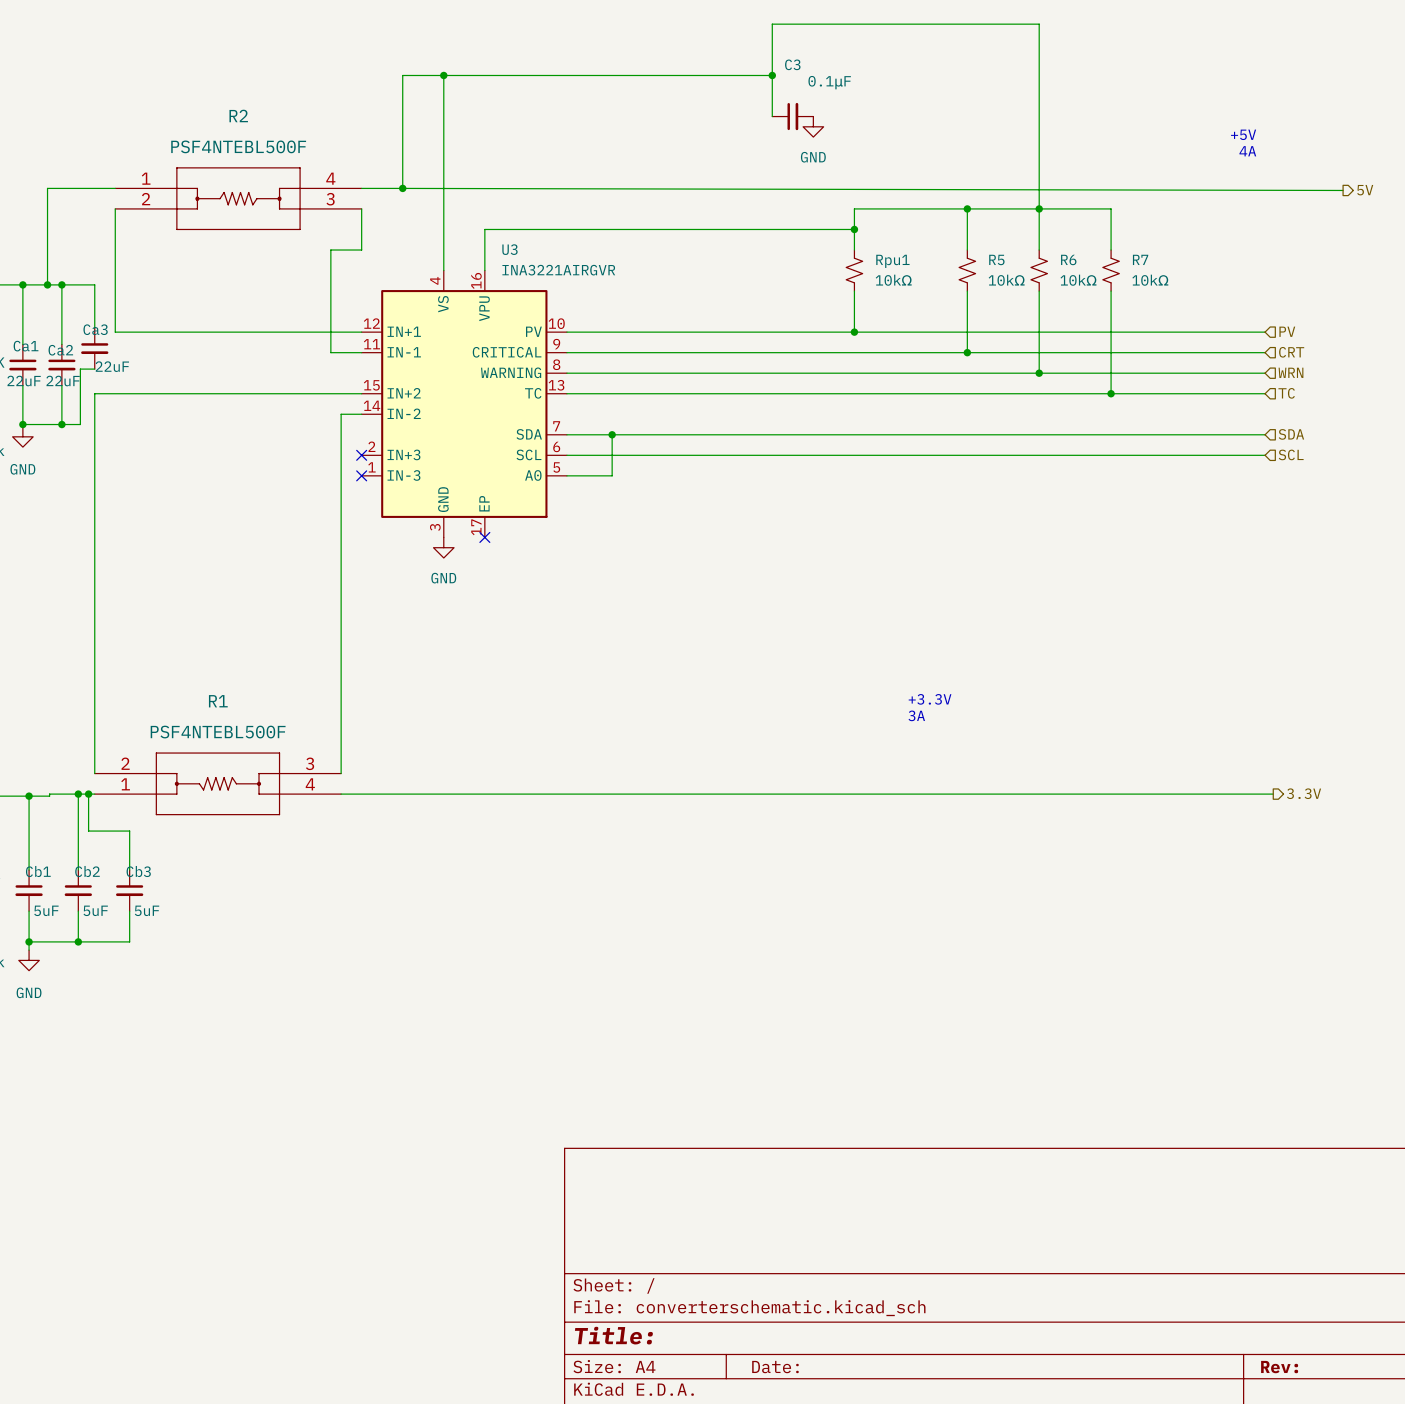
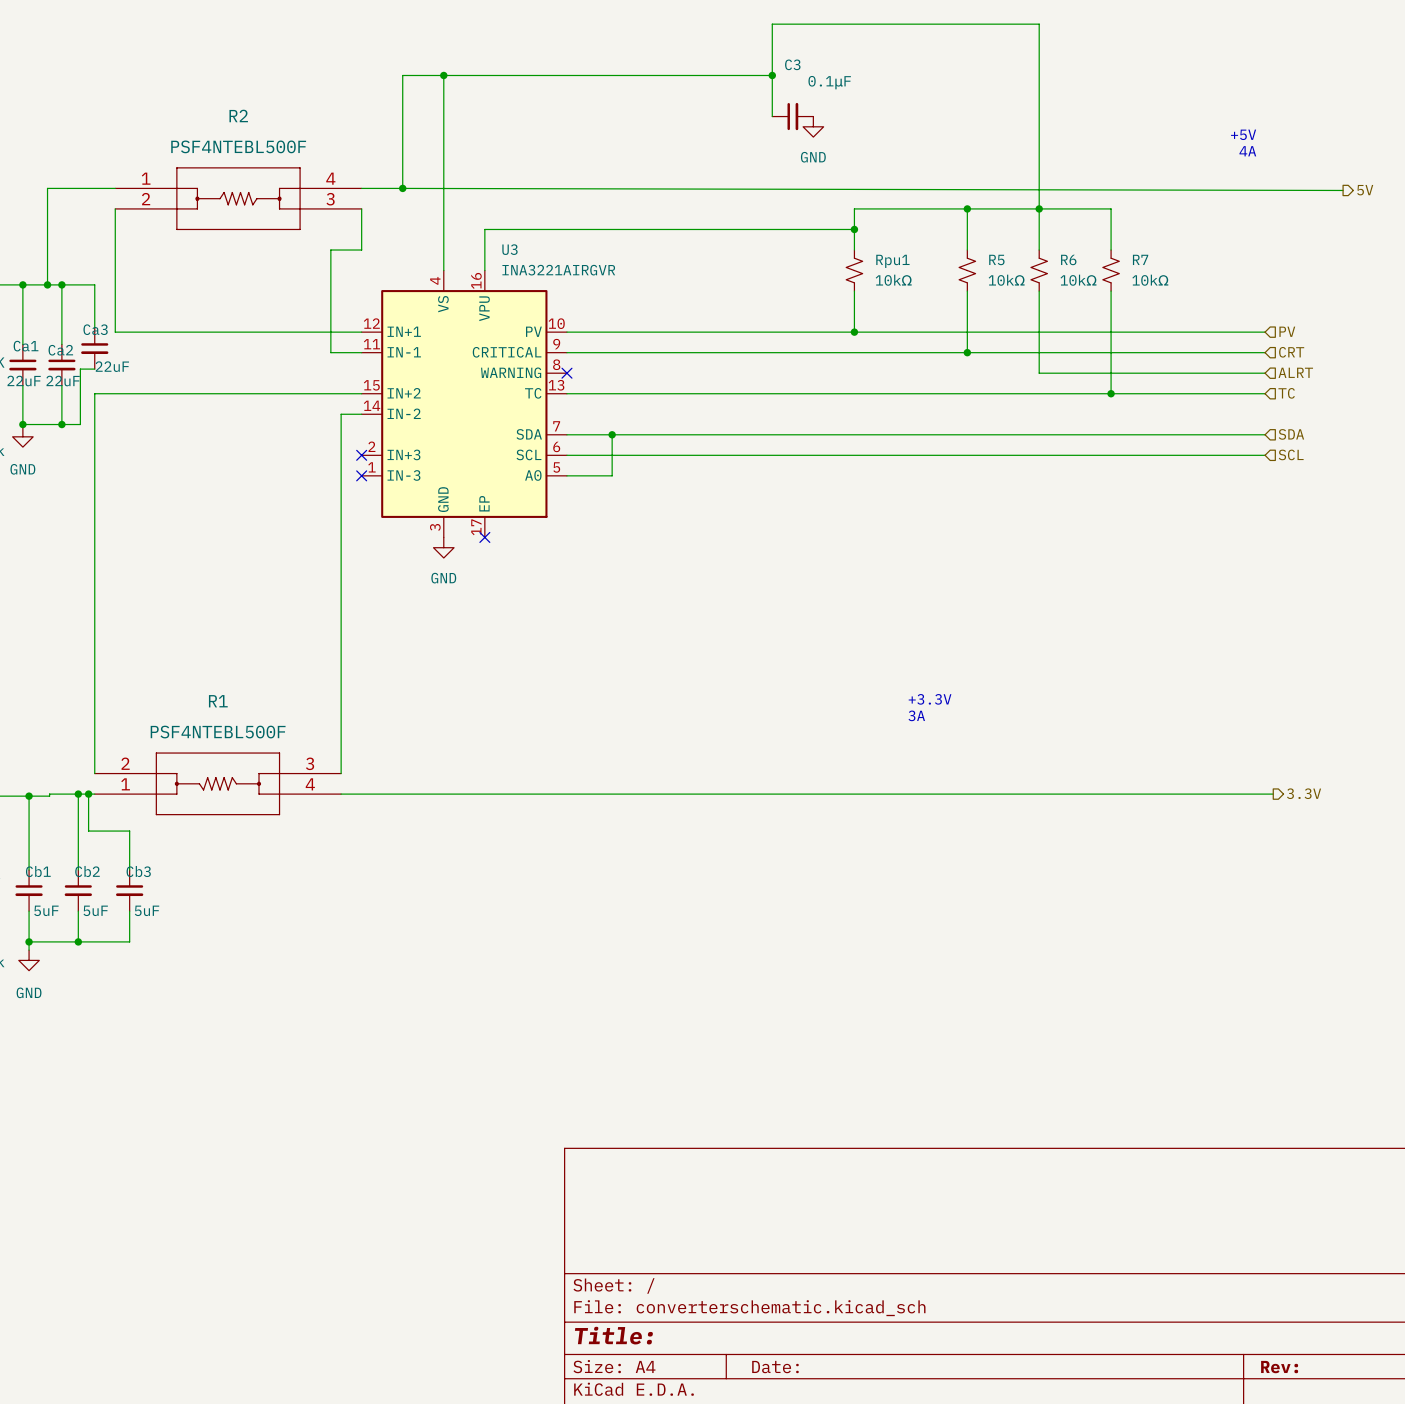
hierarchical label: WRN (1290, 372) -> ALRT (1295, 372)
wire: (566, 373) (1039, 373) -> none
no-connect mark: none -> (566, 373)
junction: (1039, 373) -> none

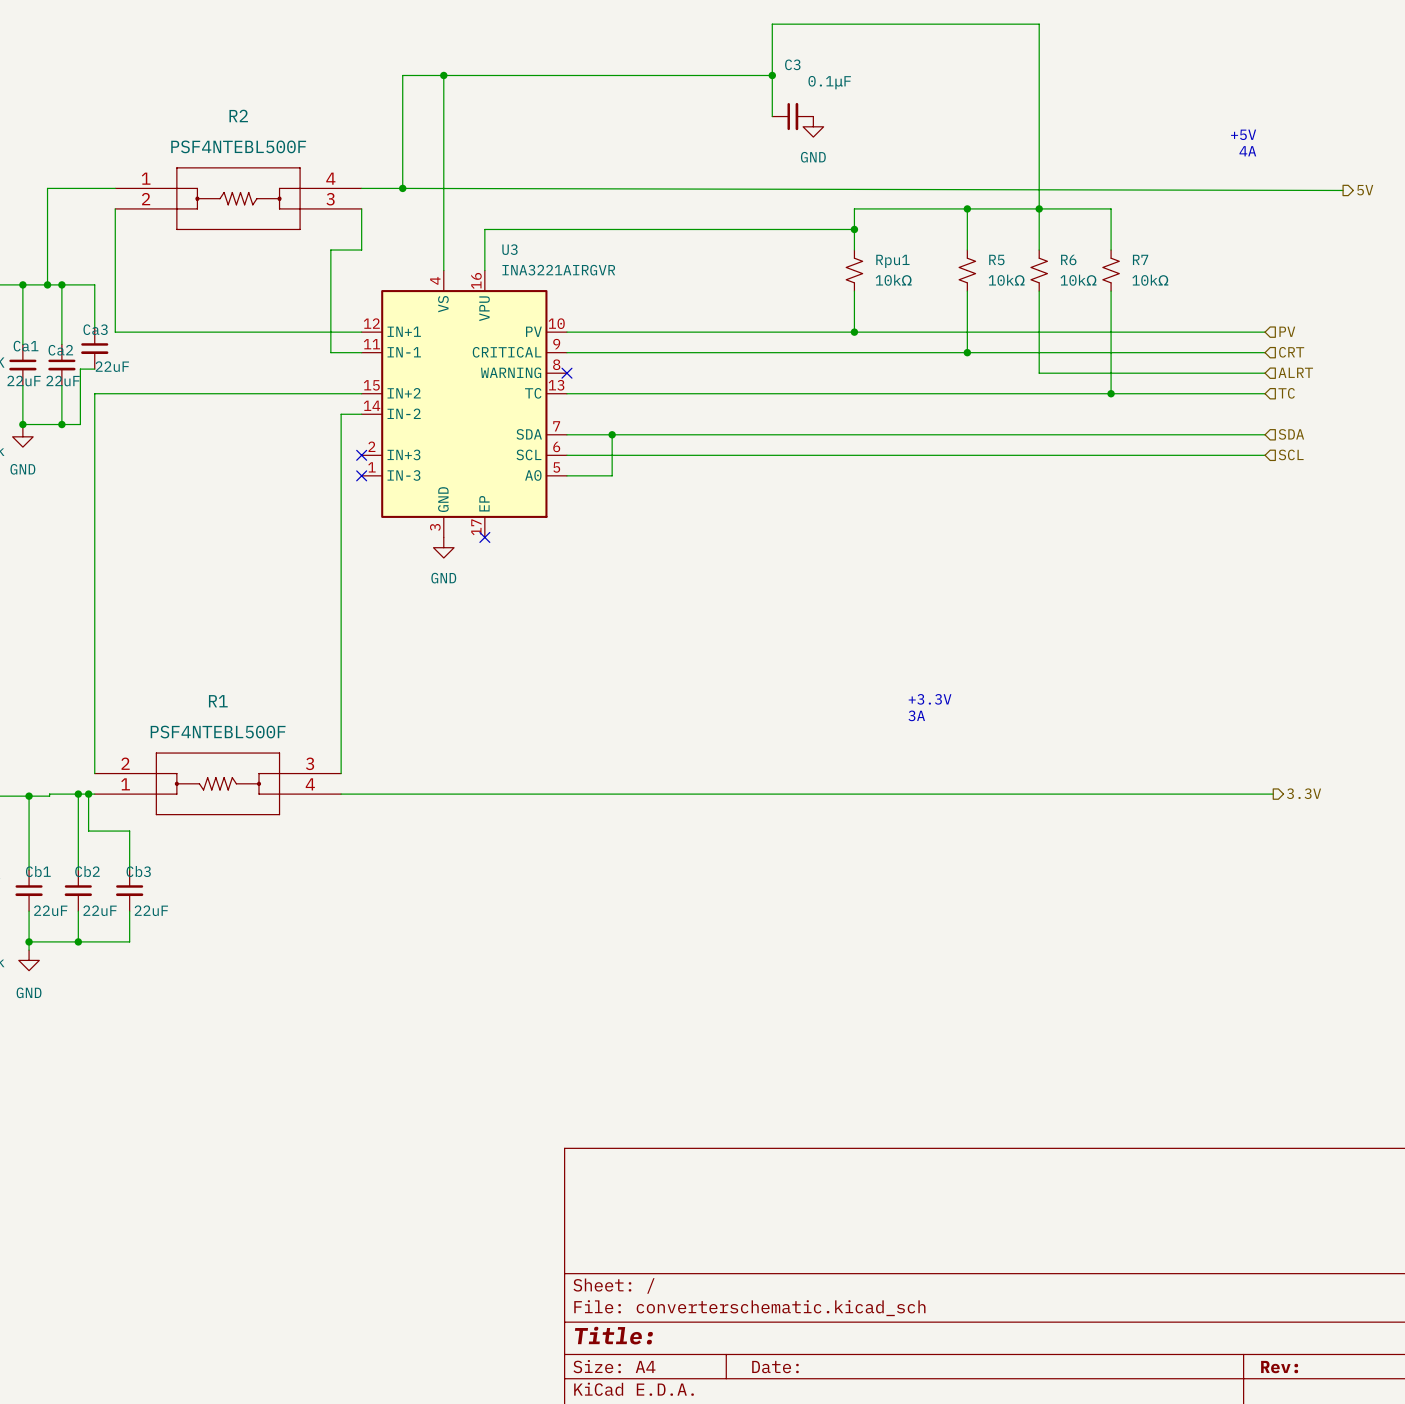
Cb1 value: 5uF (46, 910) -> 22uF (50, 910)
Cb2 value: 5uF (95, 910) -> 22uF (100, 910)
Cb3 value: 5uF (147, 910) -> 22uF (151, 910)

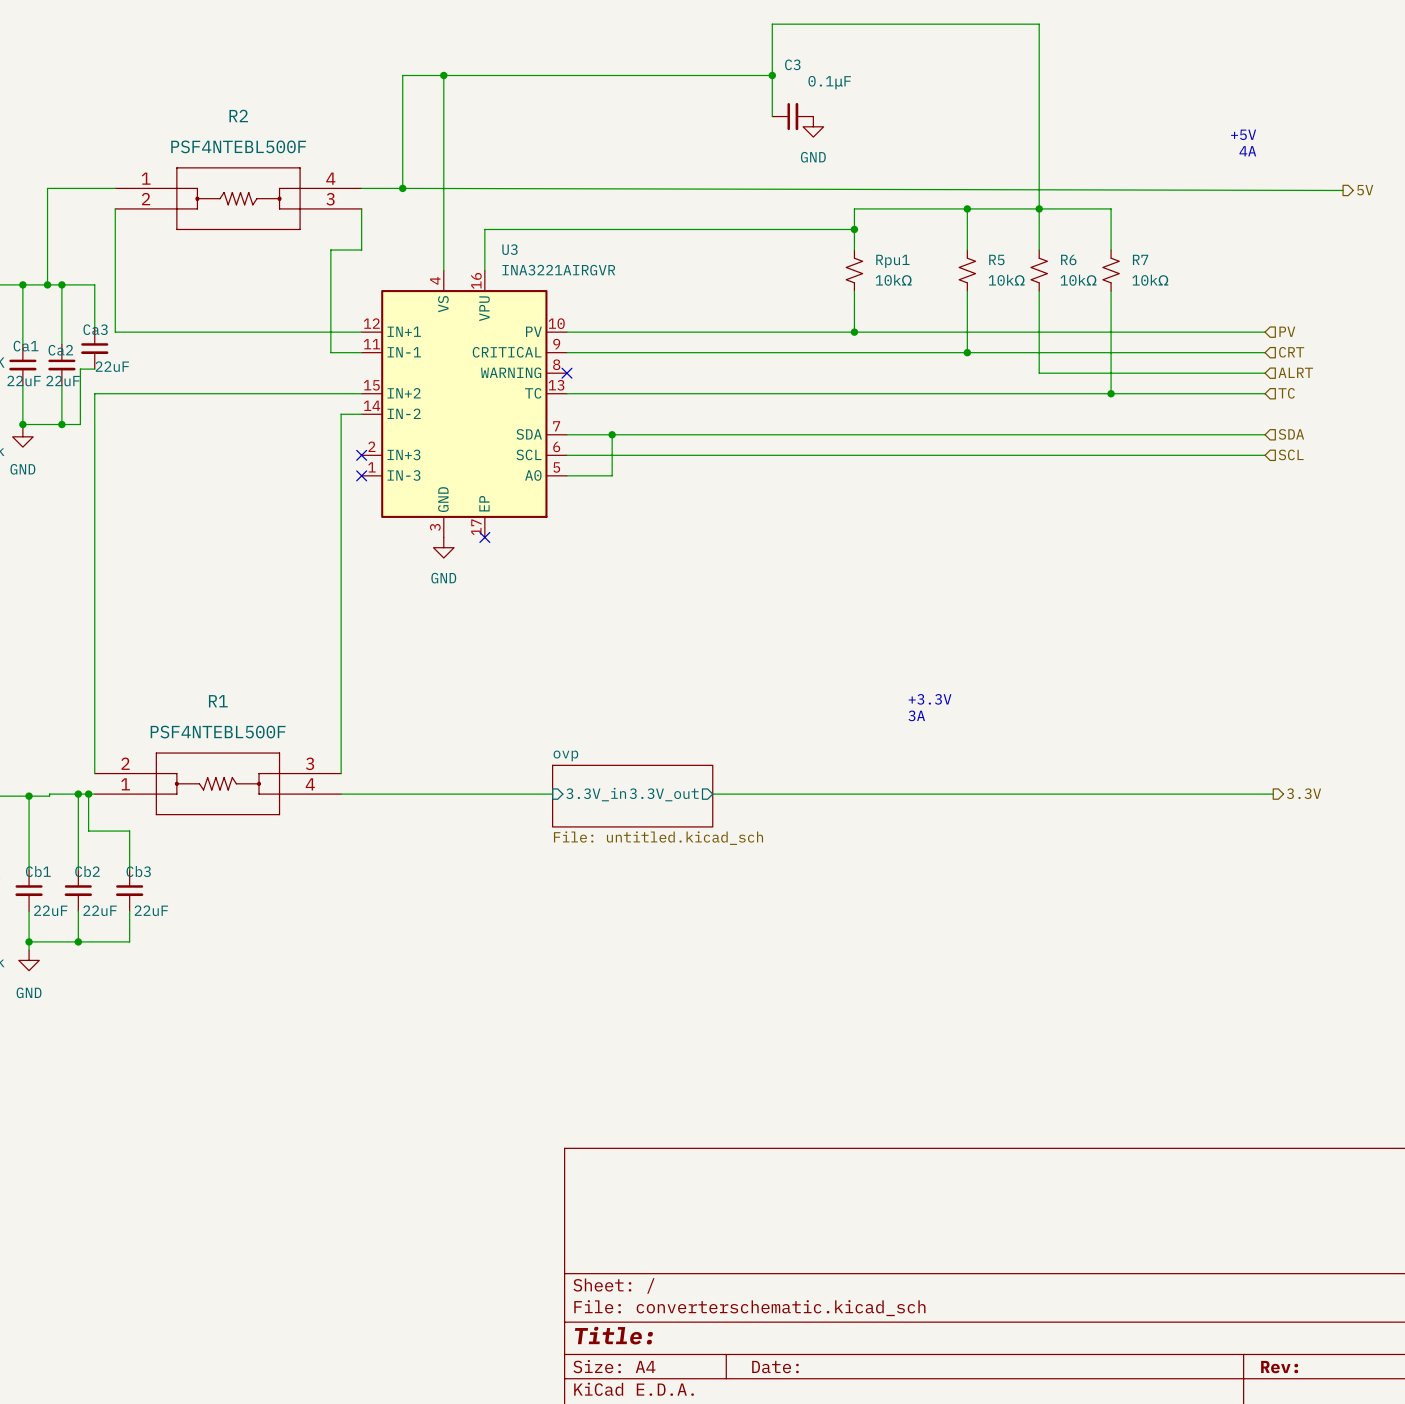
wire: (552, 794) (712, 794) -> none
sheet pin: none -> 3.3V_in (596, 794)
sheet pin: none -> 3.3V_out (664, 794)
sheet ovp: none -> File: untitled.kicad_sch (632, 796)

